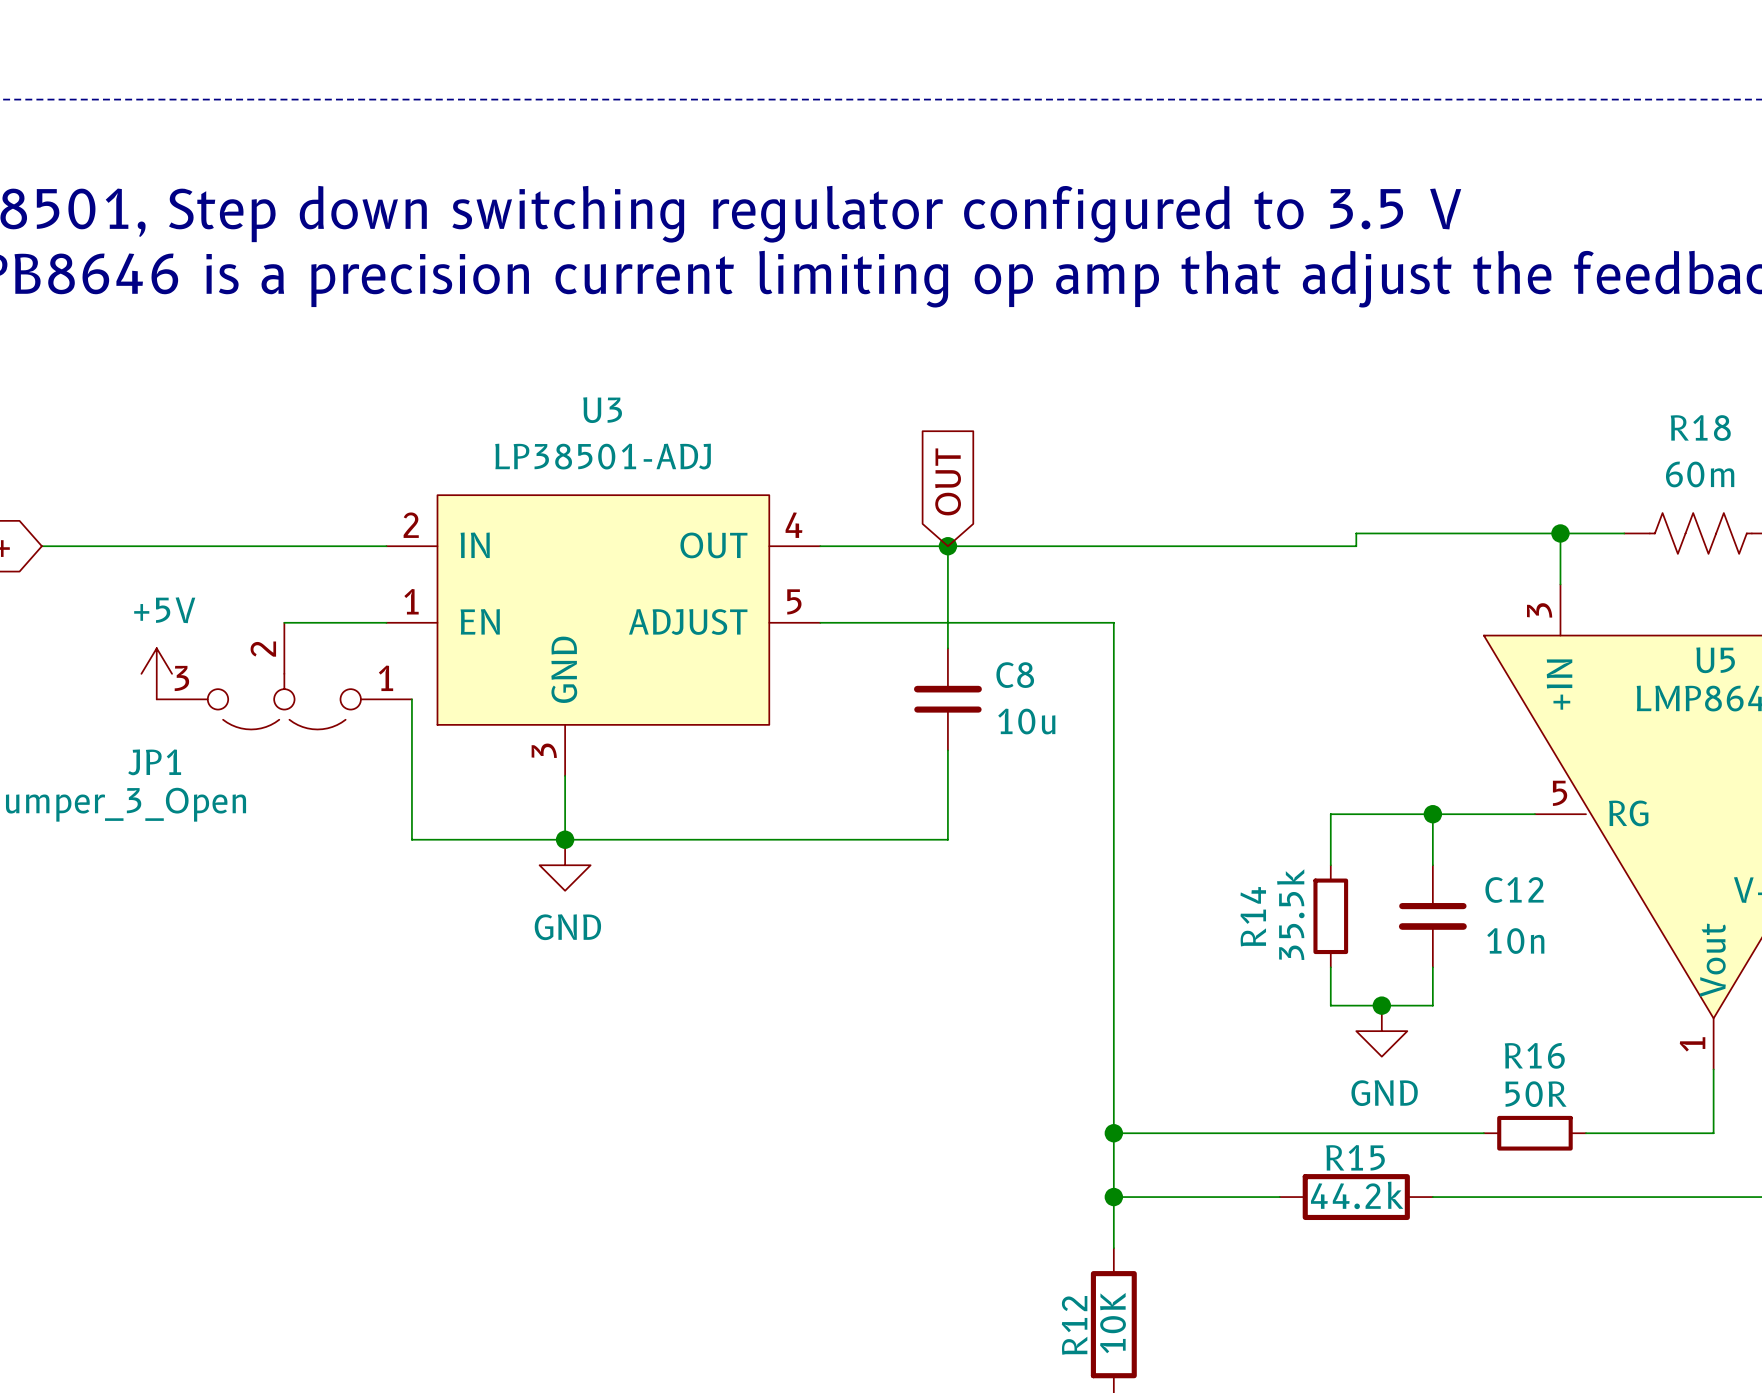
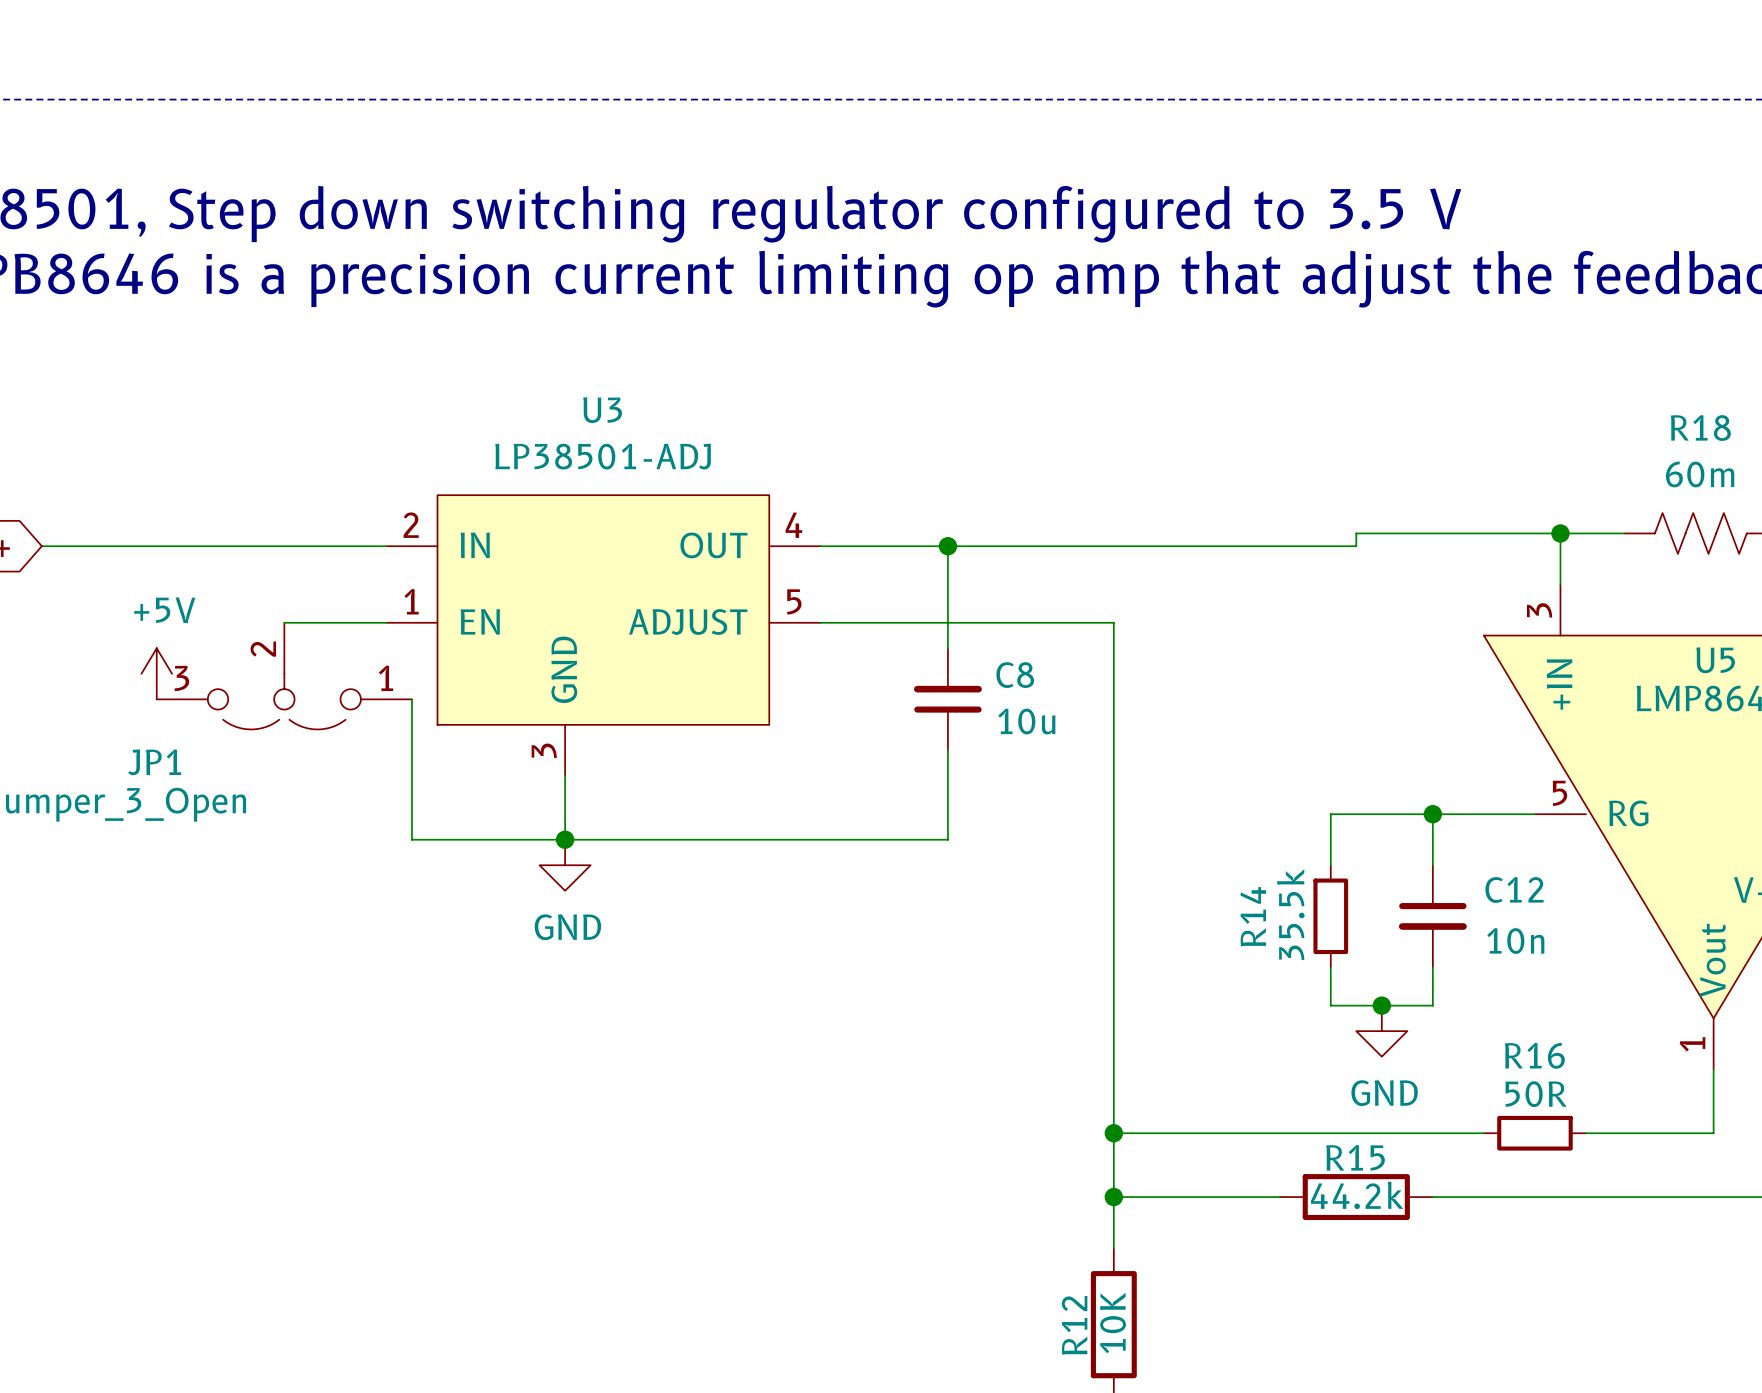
global label: OUT (948, 481) -> none

